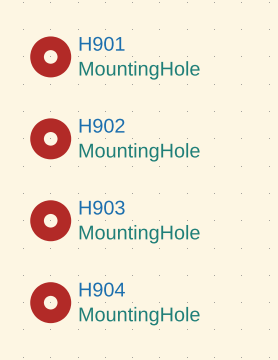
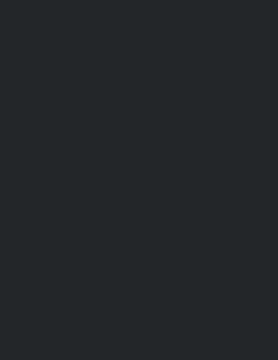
H901: MountingHole (50, 56) -> none
H902: MountingHole (50, 138) -> none
H903: MountingHole (50, 220) -> none
H904: MountingHole (50, 302) -> none

